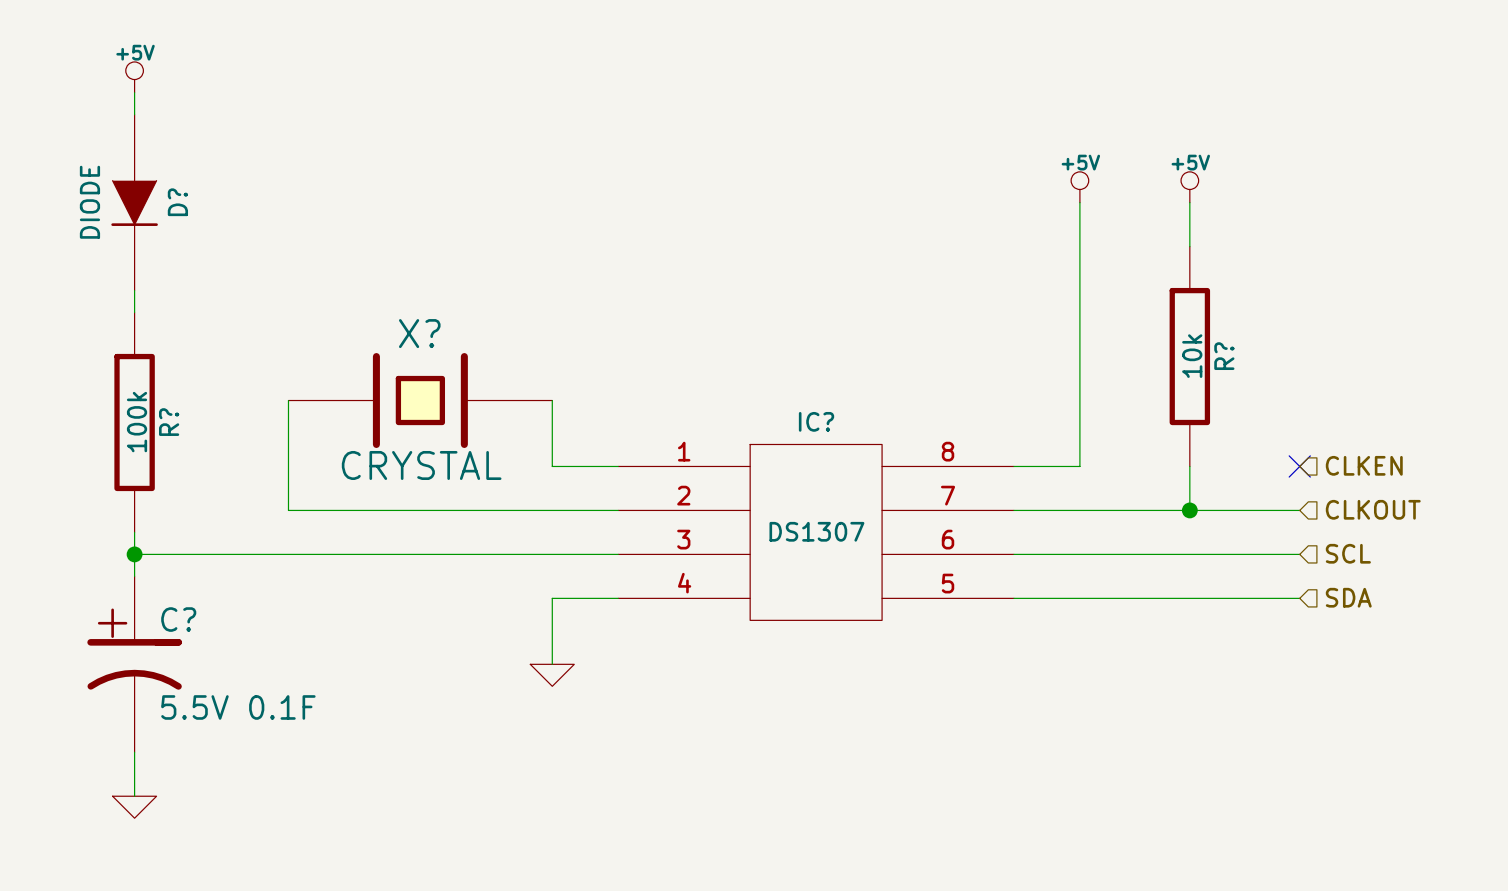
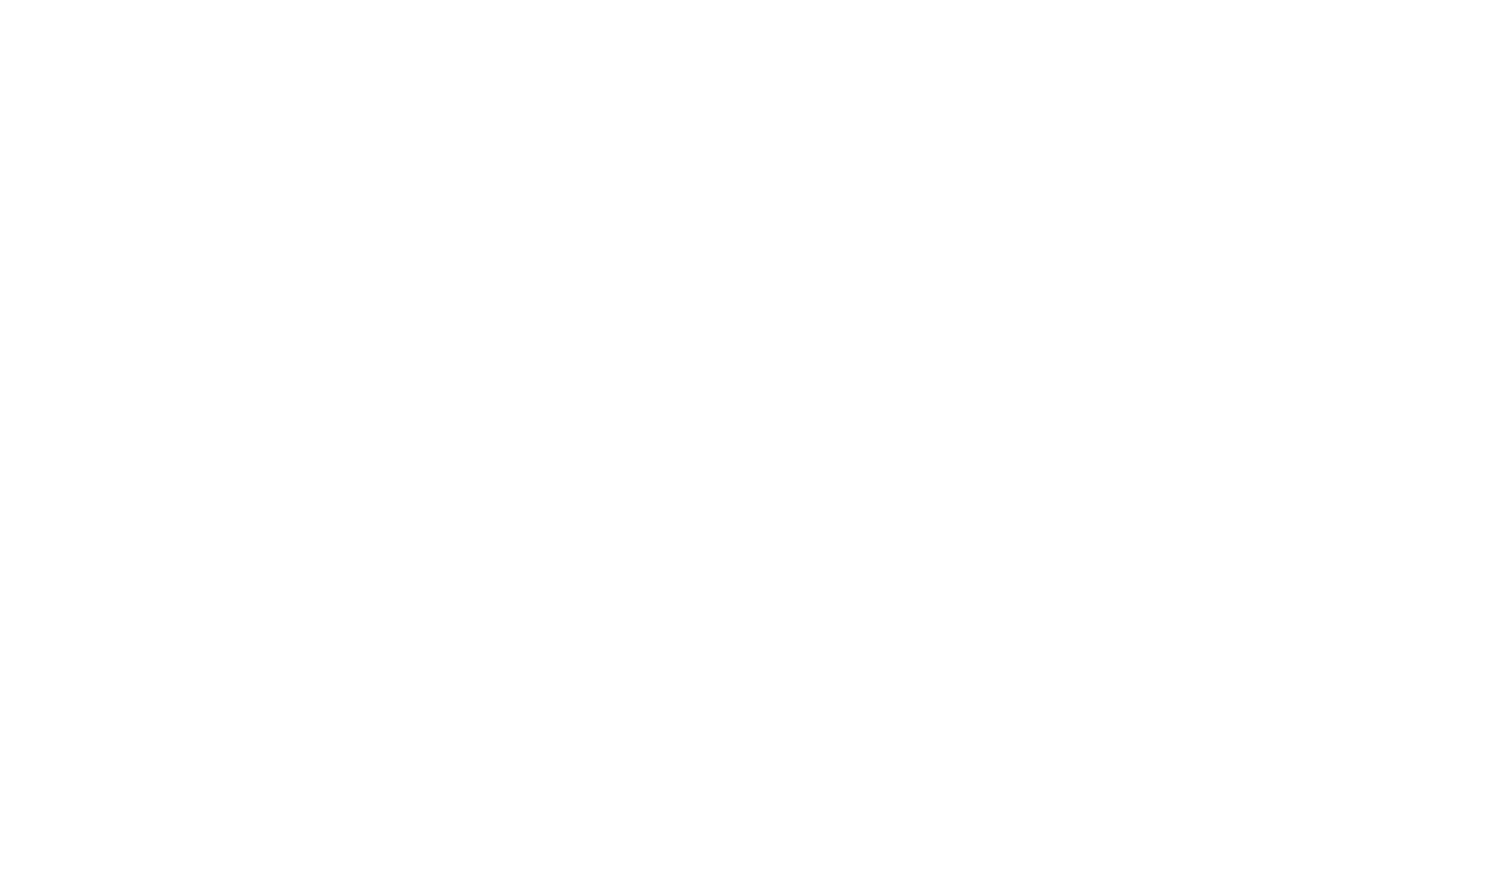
power symbol: +5V (134, 77) -> none
wire: (134, 92) (134, 114) -> none
power symbol: +5V (1079, 187) -> none
power symbol: +5V (1189, 187) -> none
D?: DIODE (134, 202) -> none
wire: (1079, 202) (1079, 466) (1013, 466) -> none
wire: (1189, 202) (1189, 246) -> none
wire: (134, 290) (134, 312) -> none
R?: 10k (1189, 356) -> none
wire: (288, 400) (288, 510) (618, 510) -> none
X?: CRYSTAL (420, 400) -> none
wire: (552, 400) (552, 466) (618, 466) -> none
R?: 100k (134, 422) -> none
hierarchical label: CLKEN (1364, 465) -> none
wire: (1189, 466) (1189, 510) -> none
no-connect mark: (1299, 466) -> none
hierarchical label: CLKOUT (1373, 509) -> none
wire: (1013, 510) (1299, 510) -> none
junction: (1189, 510) -> none
wire: (134, 532) (134, 576) -> none
IC?: DS1307 (816, 532) -> none
hierarchical label: SCL (1348, 553) -> none
wire: (134, 554) (618, 554) -> none
junction: (134, 554) -> none
wire: (1013, 554) (1299, 554) -> none
hierarchical label: SDA (1348, 597) -> none
wire: (618, 598) (552, 598) (552, 664) -> none
wire: (1013, 598) (1299, 598) -> none
C?: 5.5V 0.1F (134, 664) -> none
power symbol: (552, 675) -> none
wire: (134, 752) (134, 796) -> none
power symbol: (134, 807) -> none

